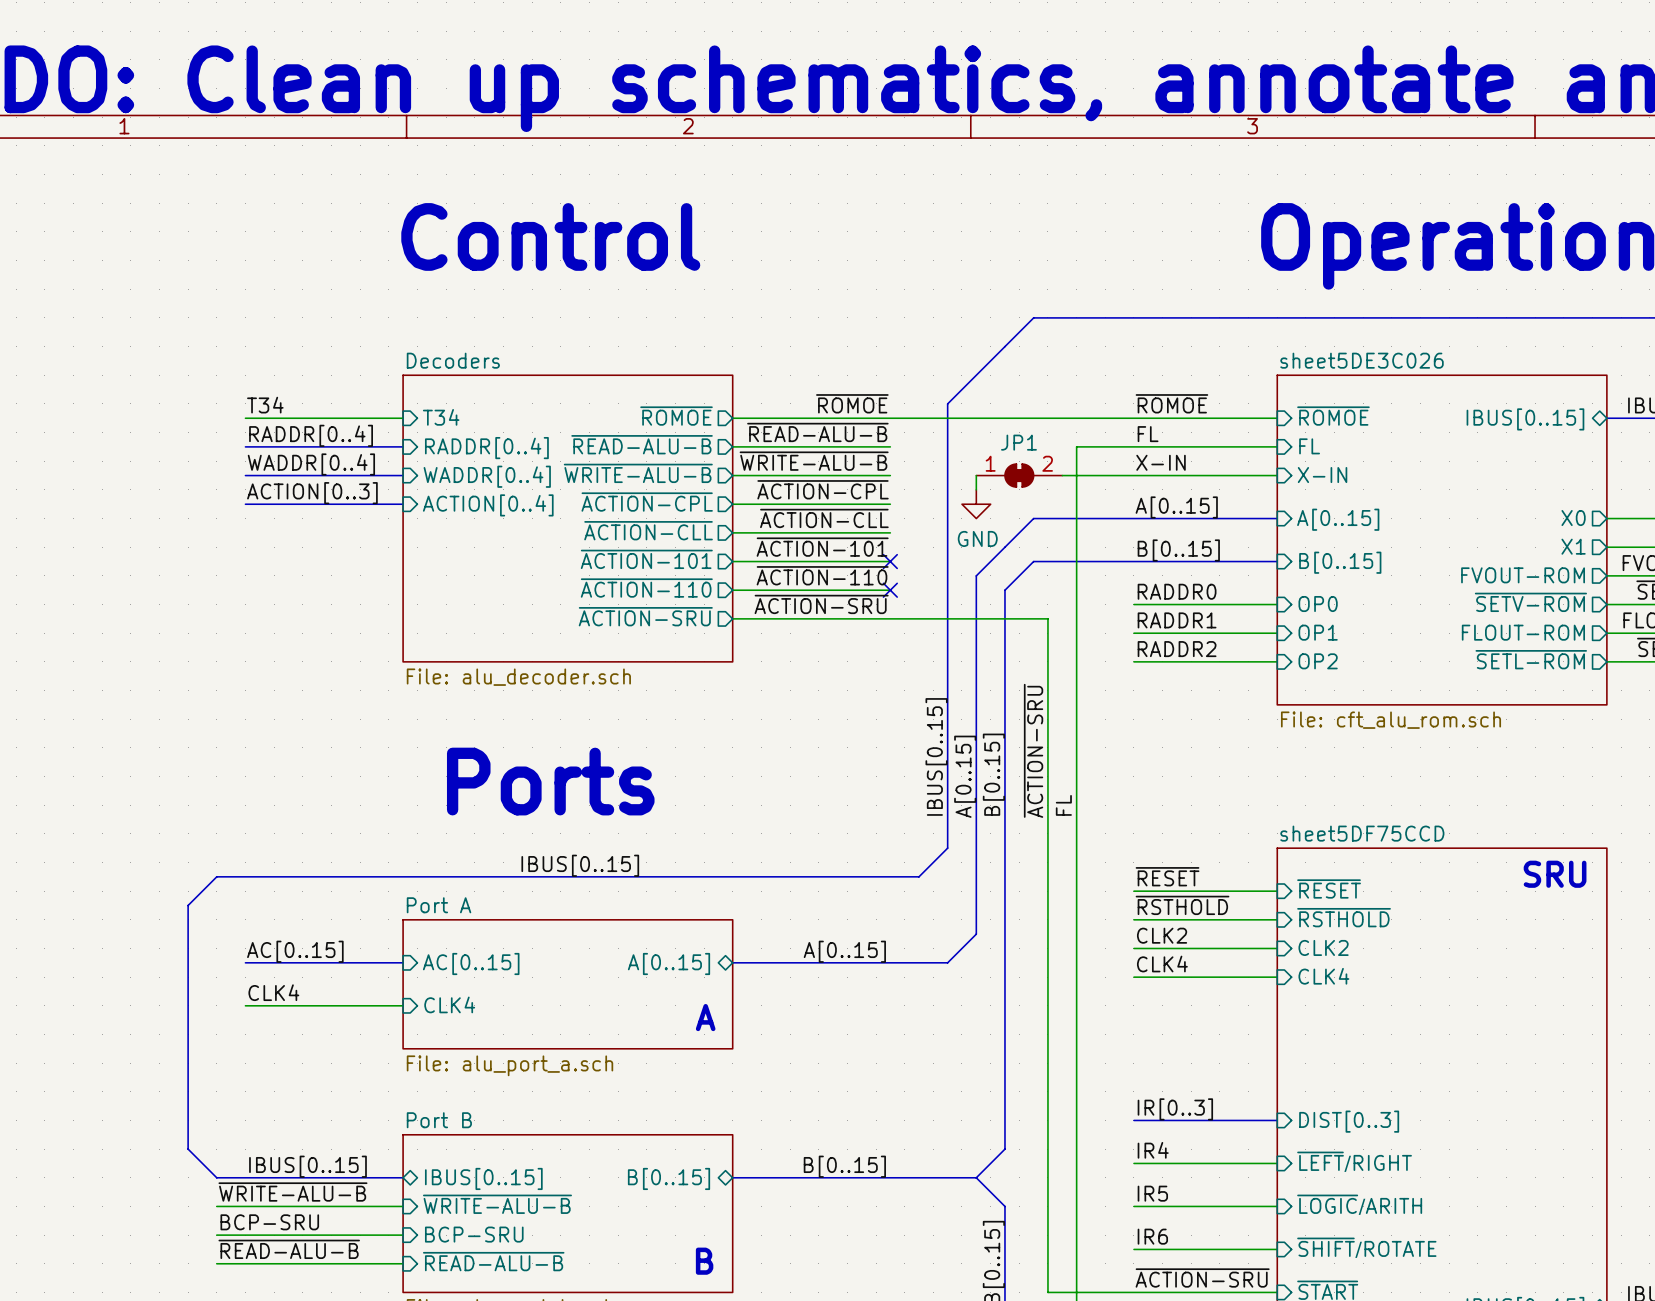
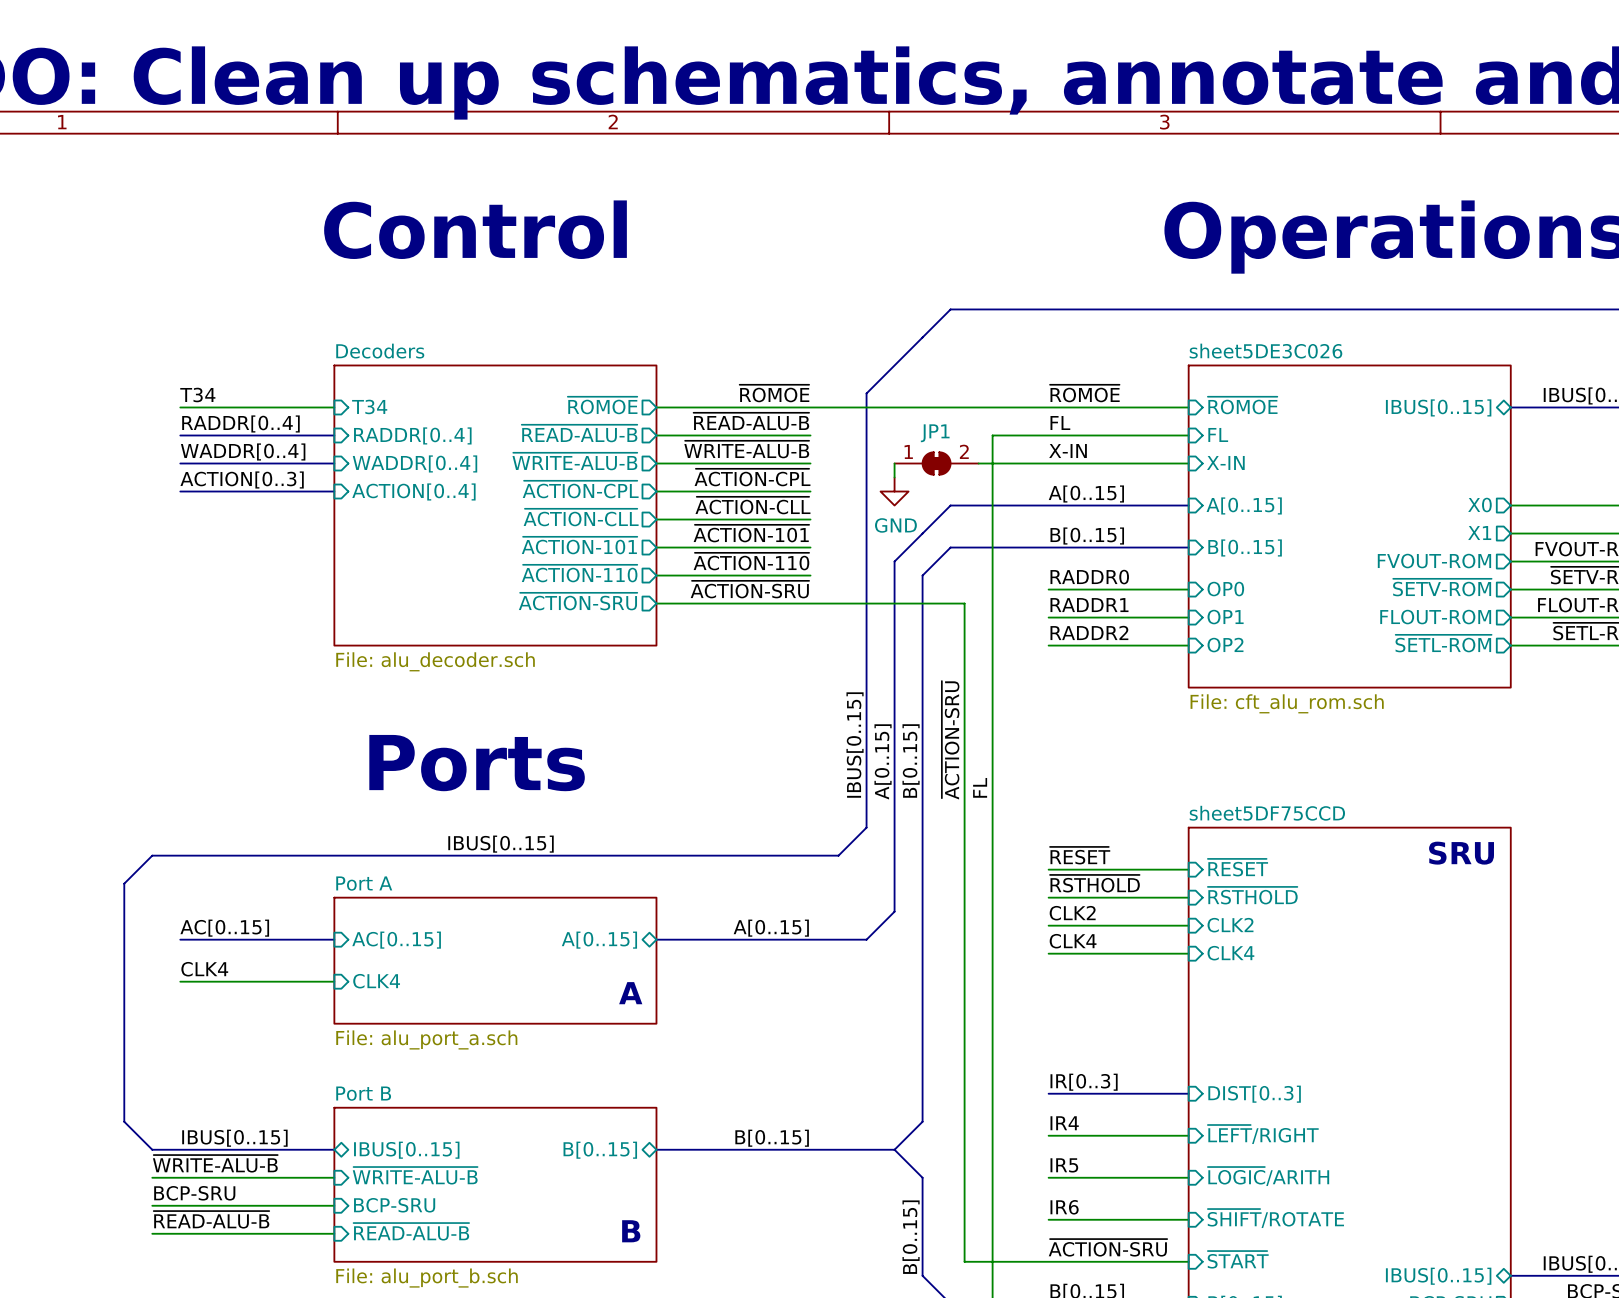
no-connect mark: (890, 561) -> none
no-connect mark: (890, 590) -> none

